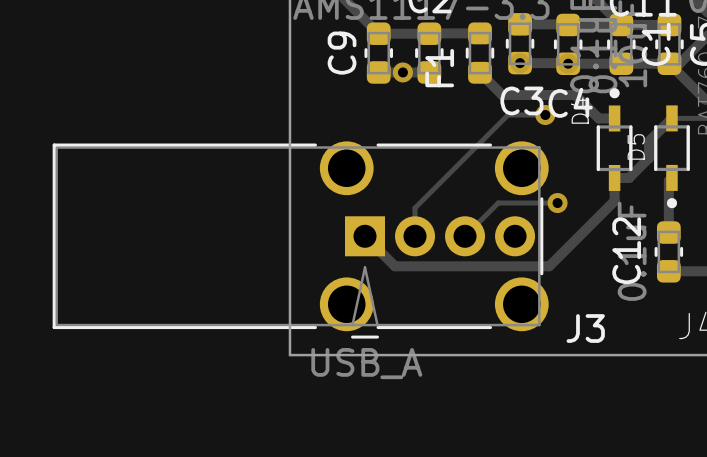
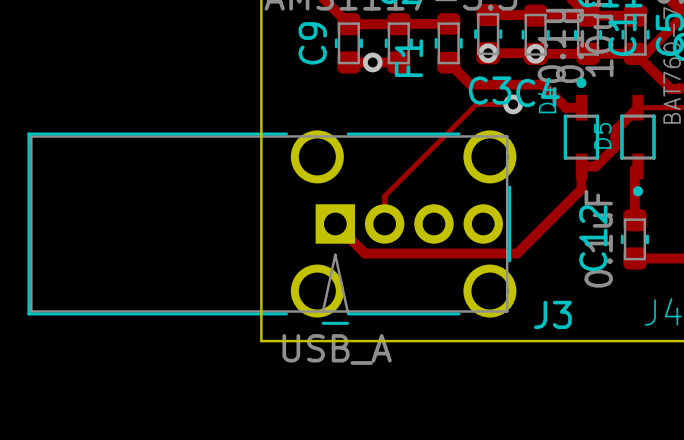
track: (557, 203) (498, 203) (465, 236) -> none
via: (557, 203) -> none

